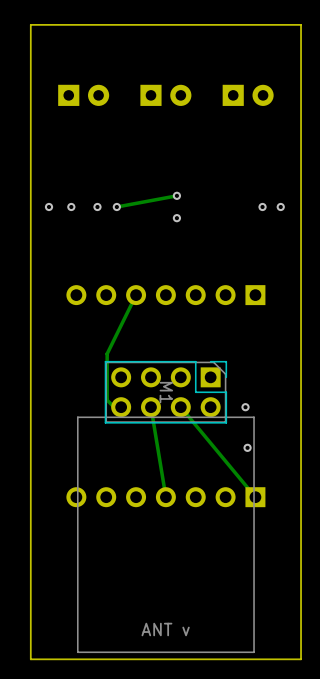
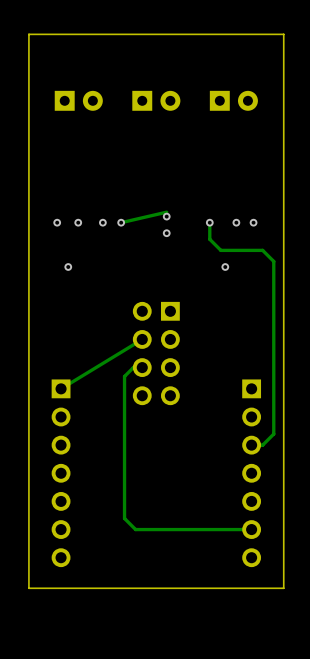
track: (176, 195) (116, 206) -> none
via: (176, 195) -> none
via: (49, 206) -> none
via: (71, 206) -> none
via: (97, 206) -> none
via: (116, 206) -> none
via: (262, 206) -> none
via: (280, 206) -> none
track: none -> (166, 212) (121, 222)
via: none -> (57, 222)
via: none -> (78, 222)
via: none -> (102, 222)
via: none -> (121, 222)
track: none -> (209, 222) (209, 239) (220, 250) (262, 250) (273, 261) (273, 434) (262, 445) (251, 445)
via: none -> (209, 222)
via: none -> (236, 222)
via: none -> (253, 222)
via: none -> (166, 233)
via: none -> (68, 267)
via: none -> (225, 267)
track: (136, 295) (107, 353) (107, 400) (114, 407) (121, 407) -> none
part: (165, 295) -> none
track: none -> (142, 339) (61, 388)
part: none -> (156, 353)
track: none -> (142, 367) (133, 367) (124, 376) (124, 518) (135, 529) (251, 529)
M1: (165, 392) -> none
track: (150, 407) (165, 497) -> none
track: (180, 407) (255, 497) -> none
via: (245, 407) -> none
line: (254, 417) (77, 417) (77, 652) (254, 652) (254, 417) -> none
via: (247, 447) -> none
part: none -> (61, 473)
part: none -> (251, 473)
part: (165, 497) -> none
board edge: (301, 612) (301, 659) (30, 659) (30, 612) -> (283, 588) (28, 588)
text: ANT v (165, 629) -> none

